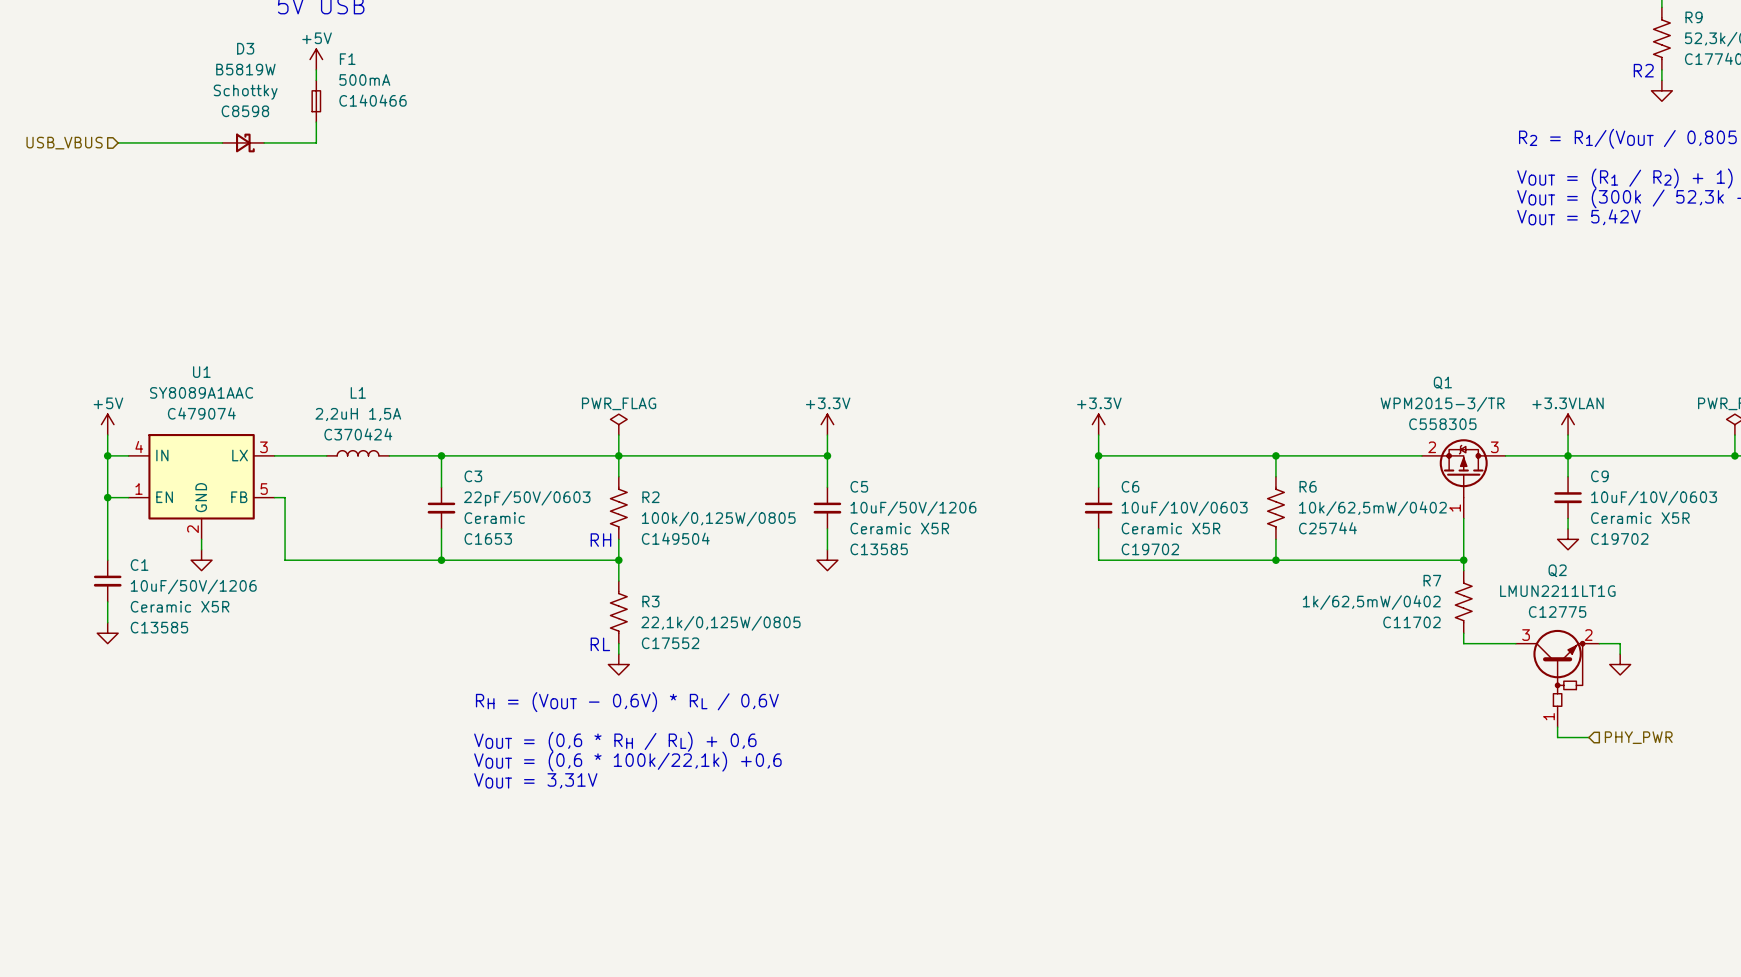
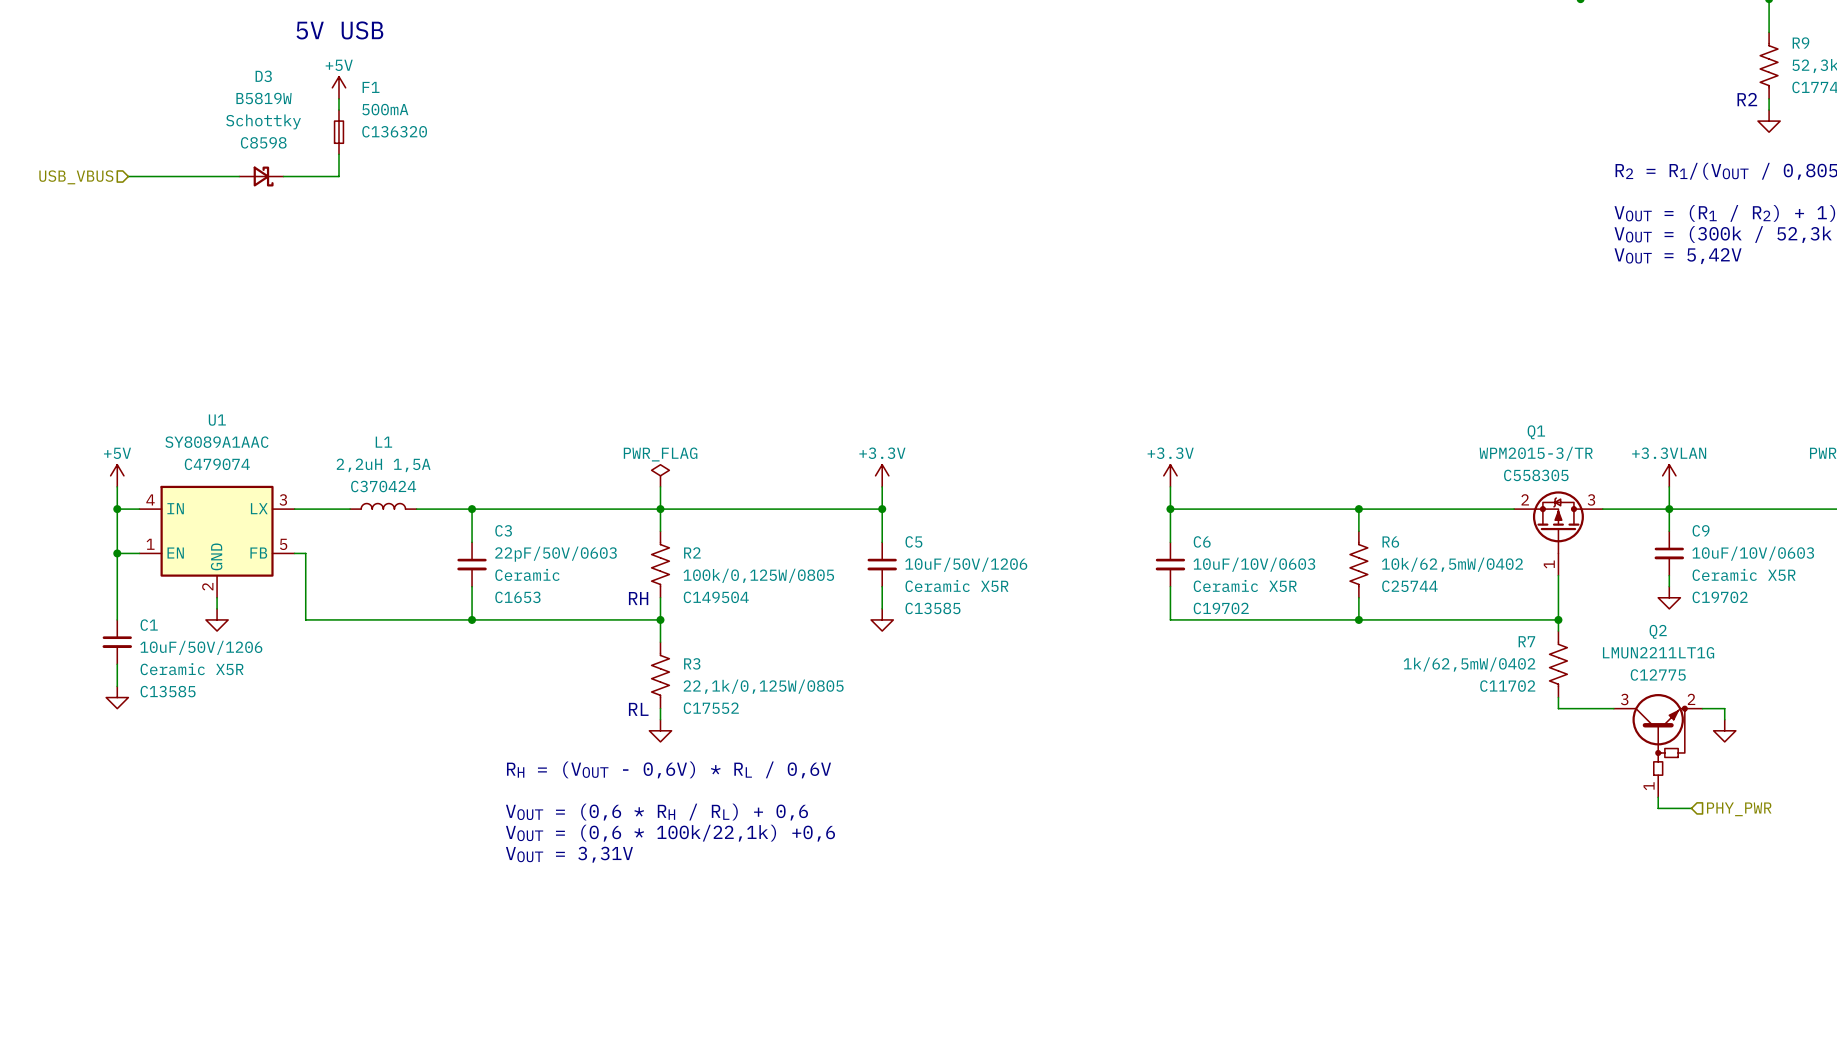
F1 text: C140466 (373, 100) -> C136320 (394, 131)

